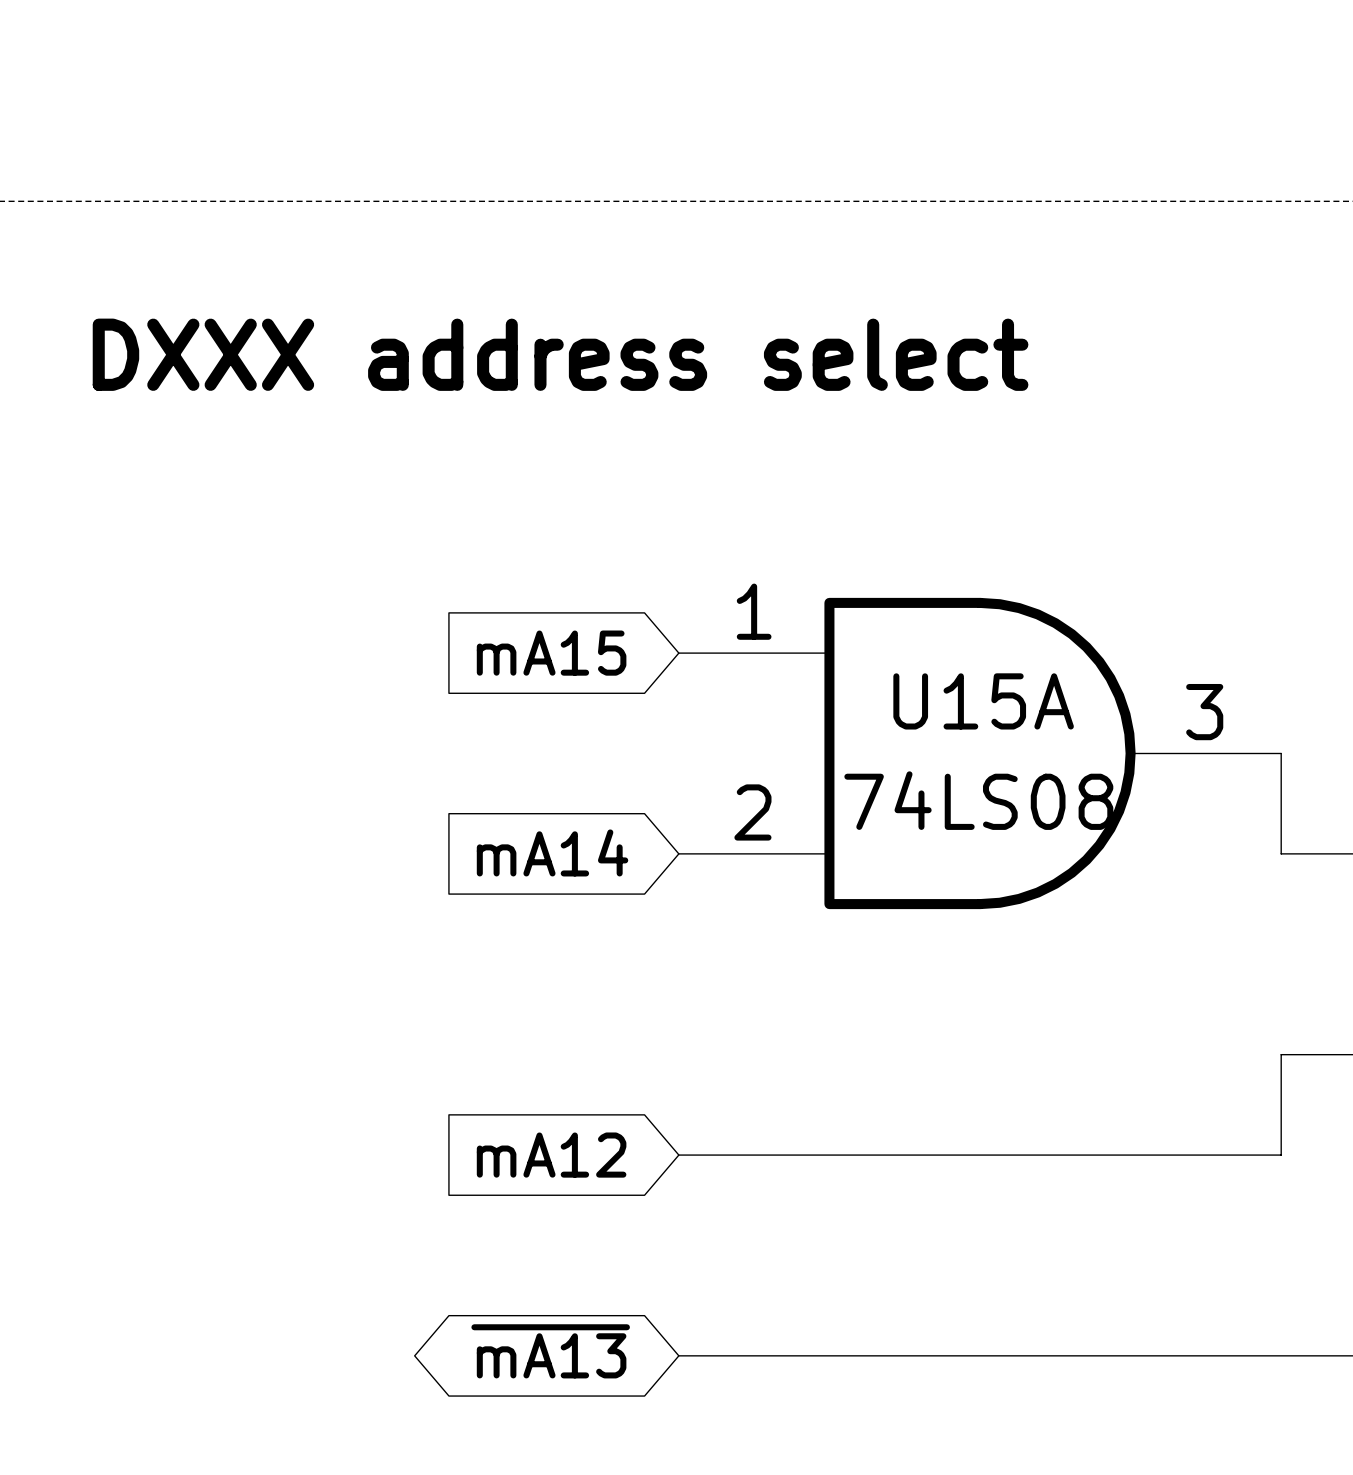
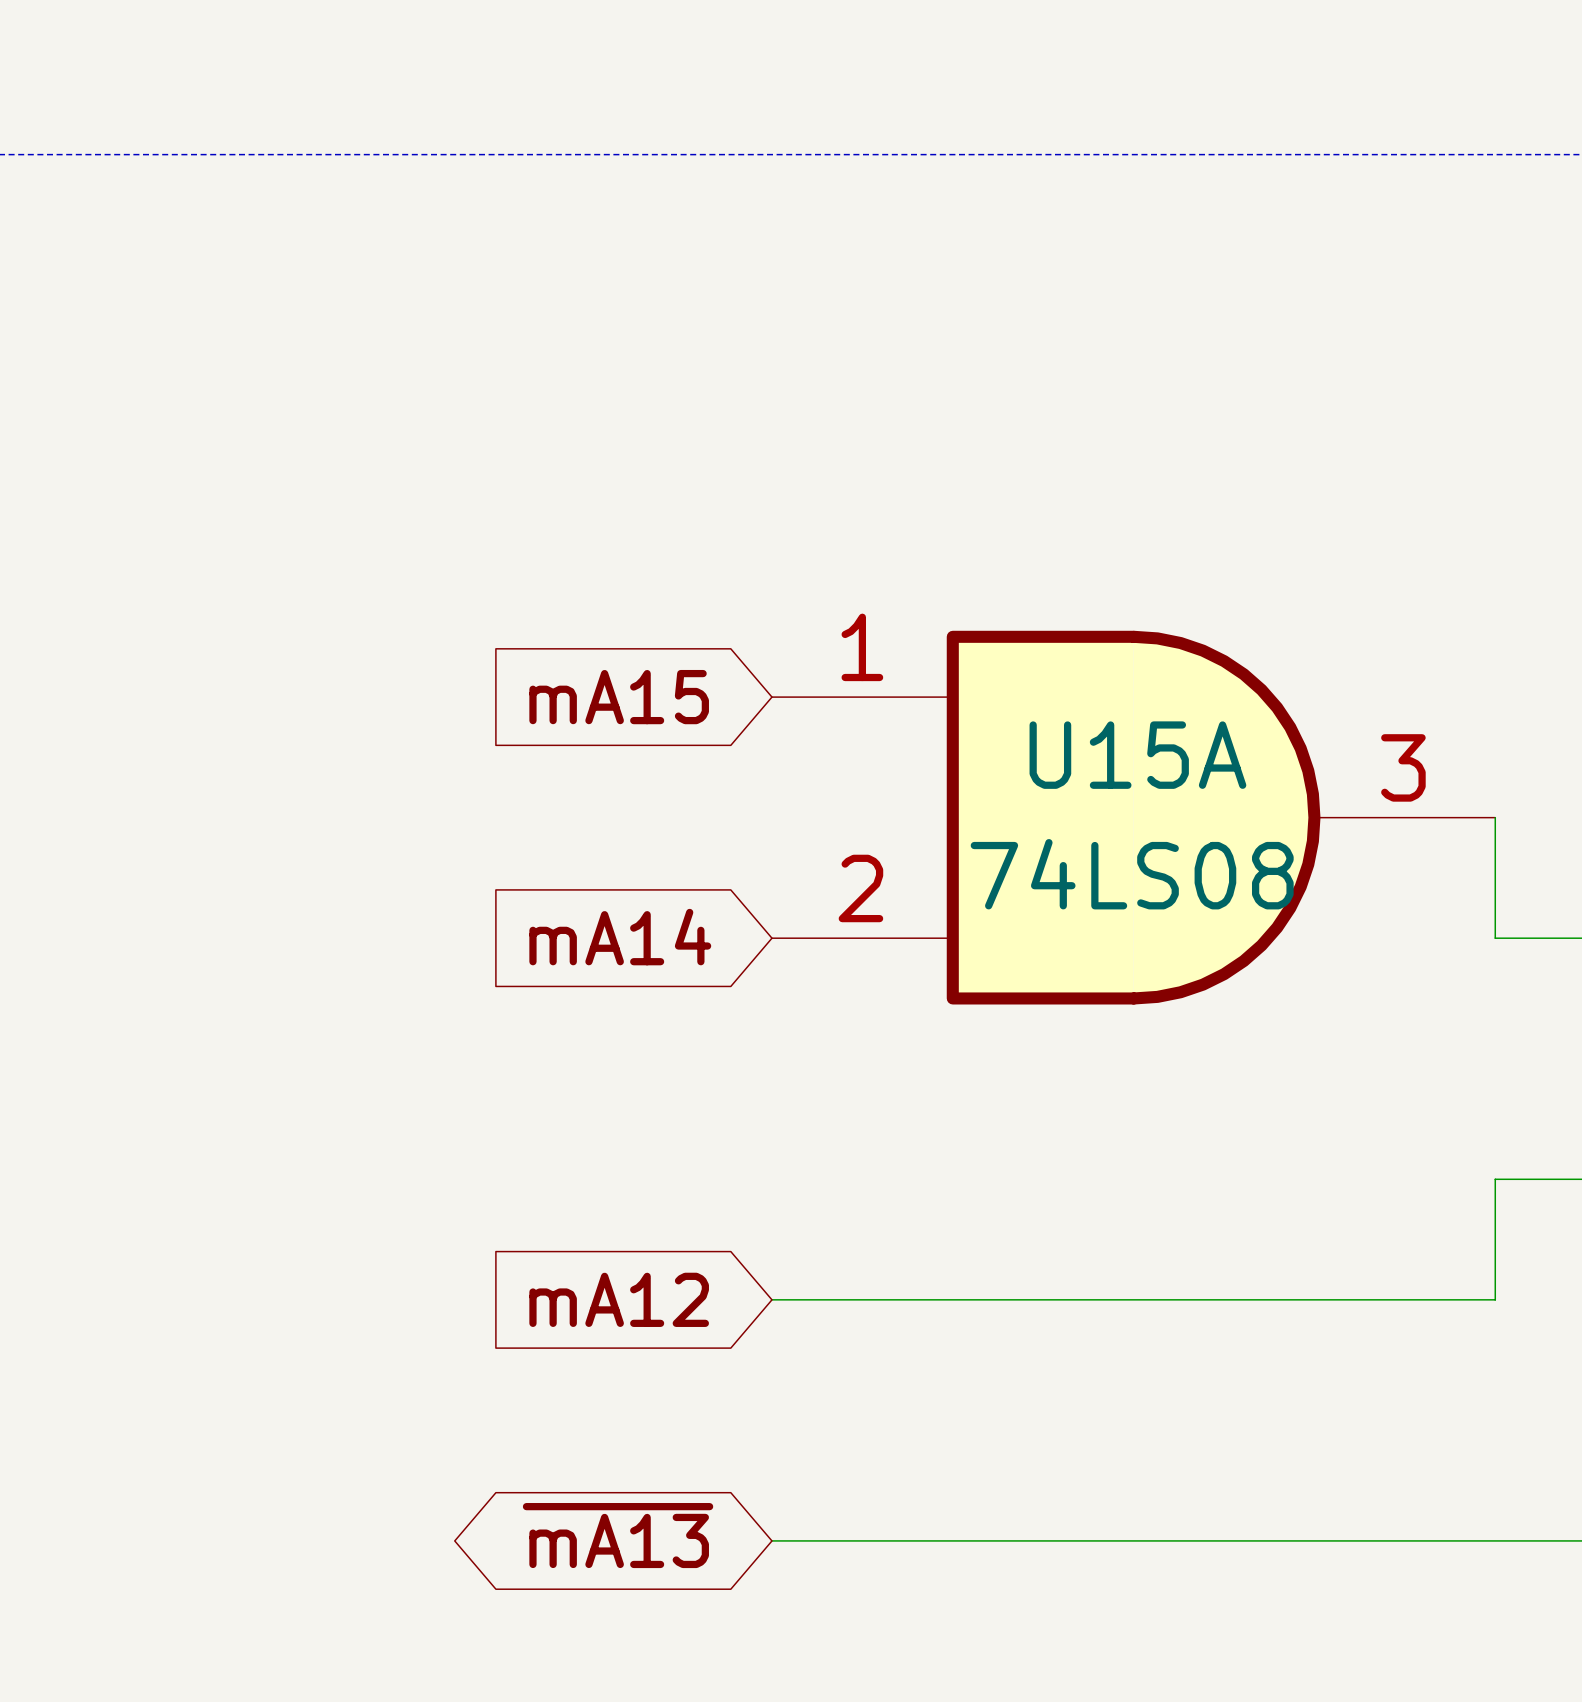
text: DXXX address select (560, 354) -> none

